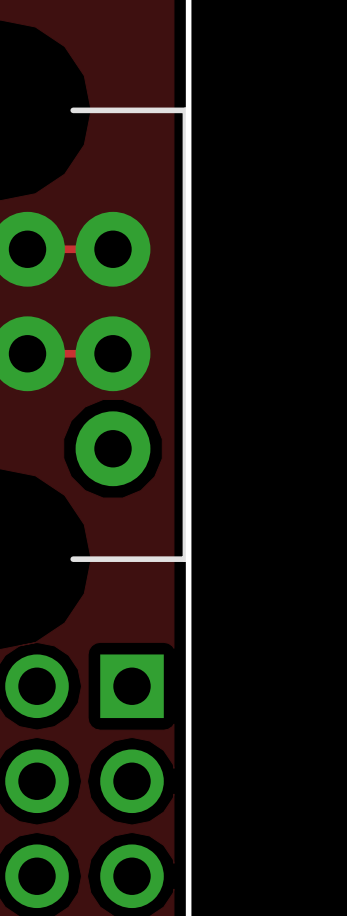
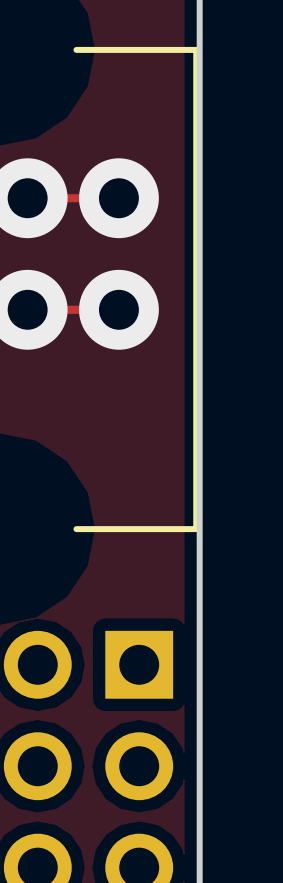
via: (113, 448) -> none

